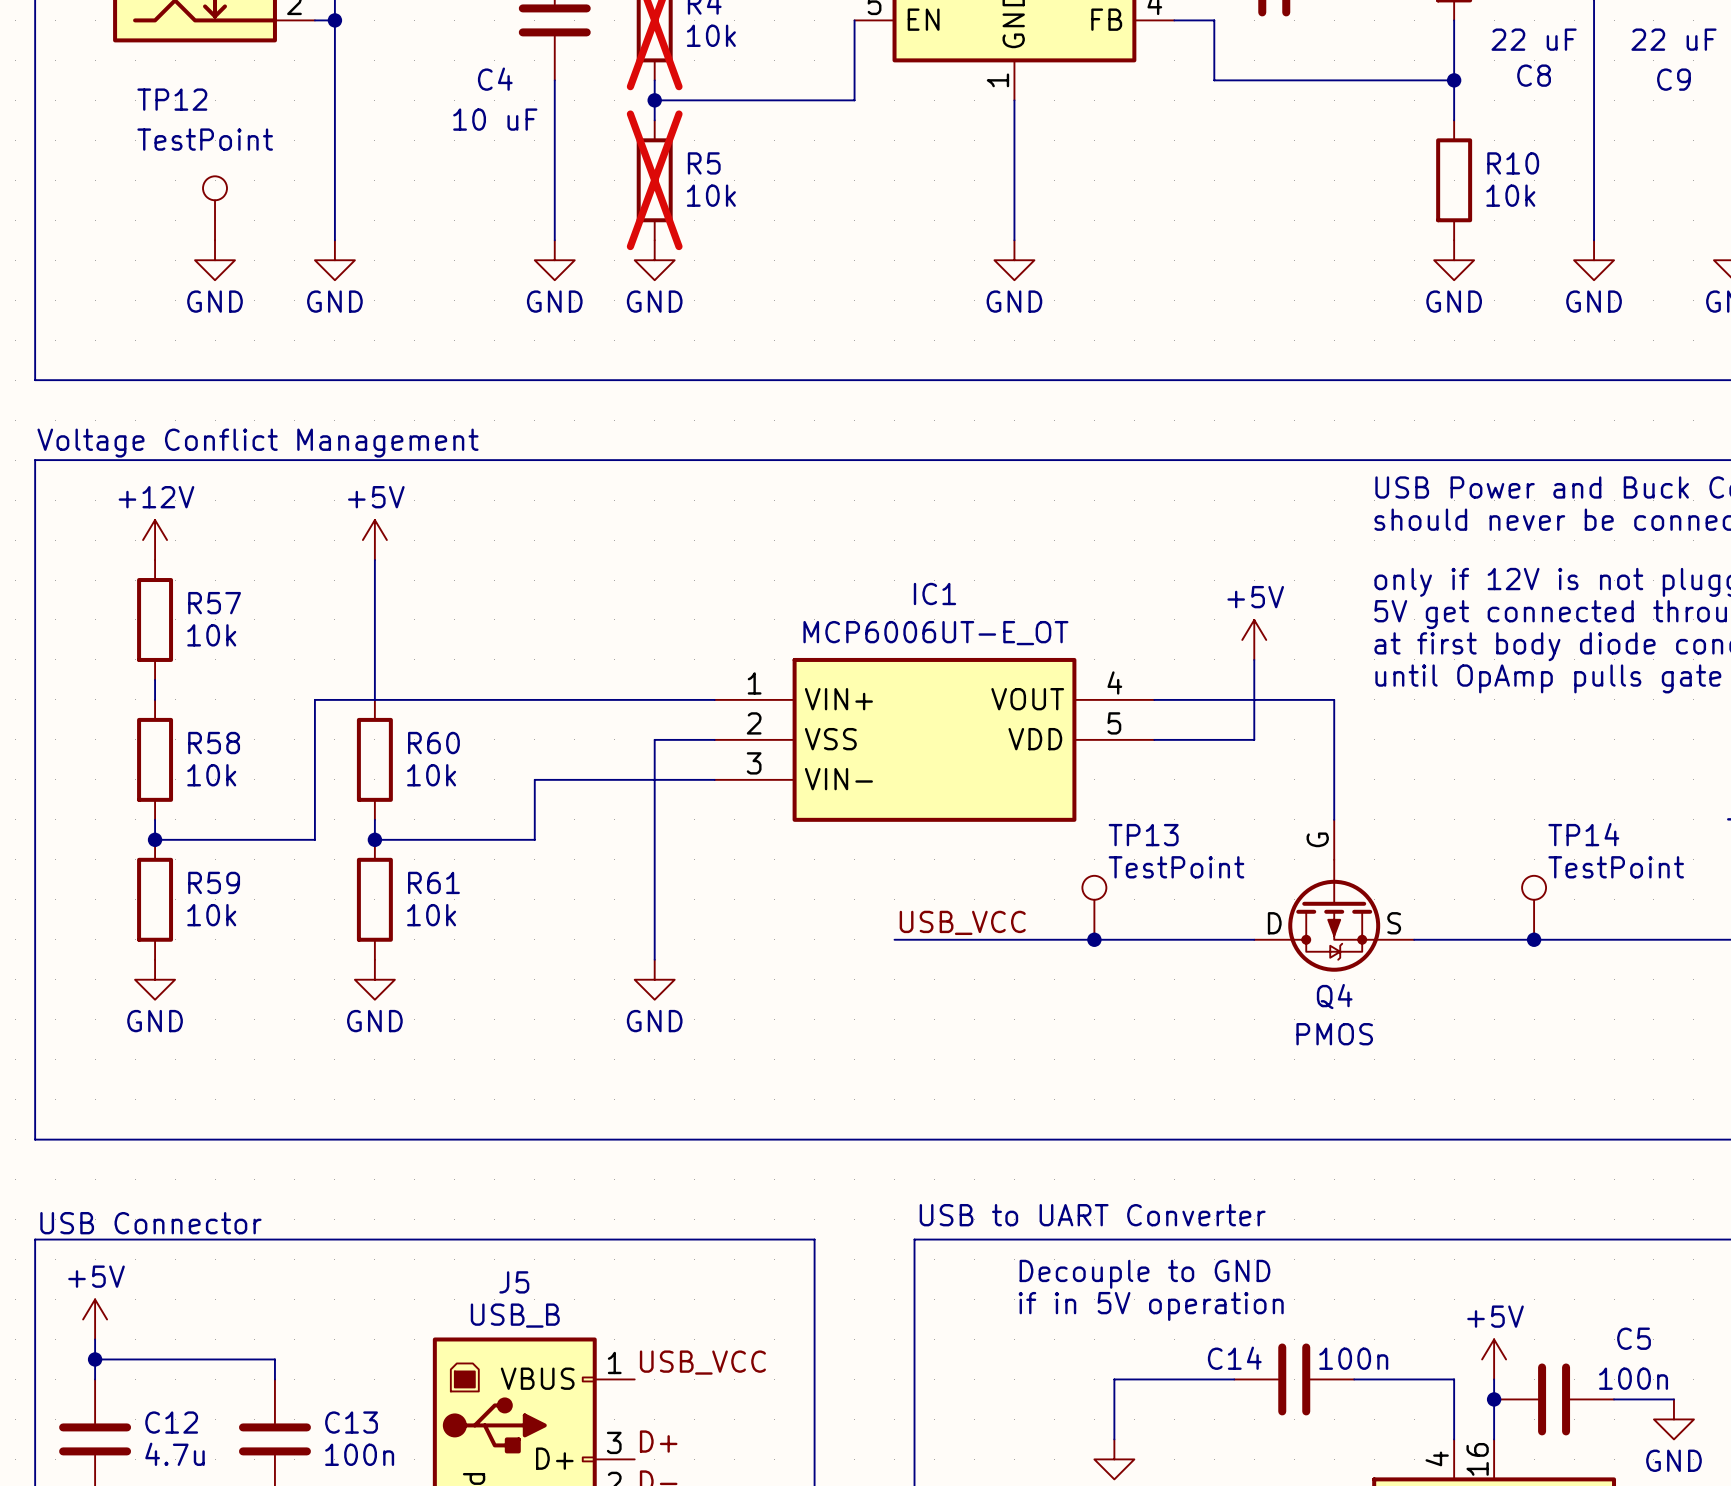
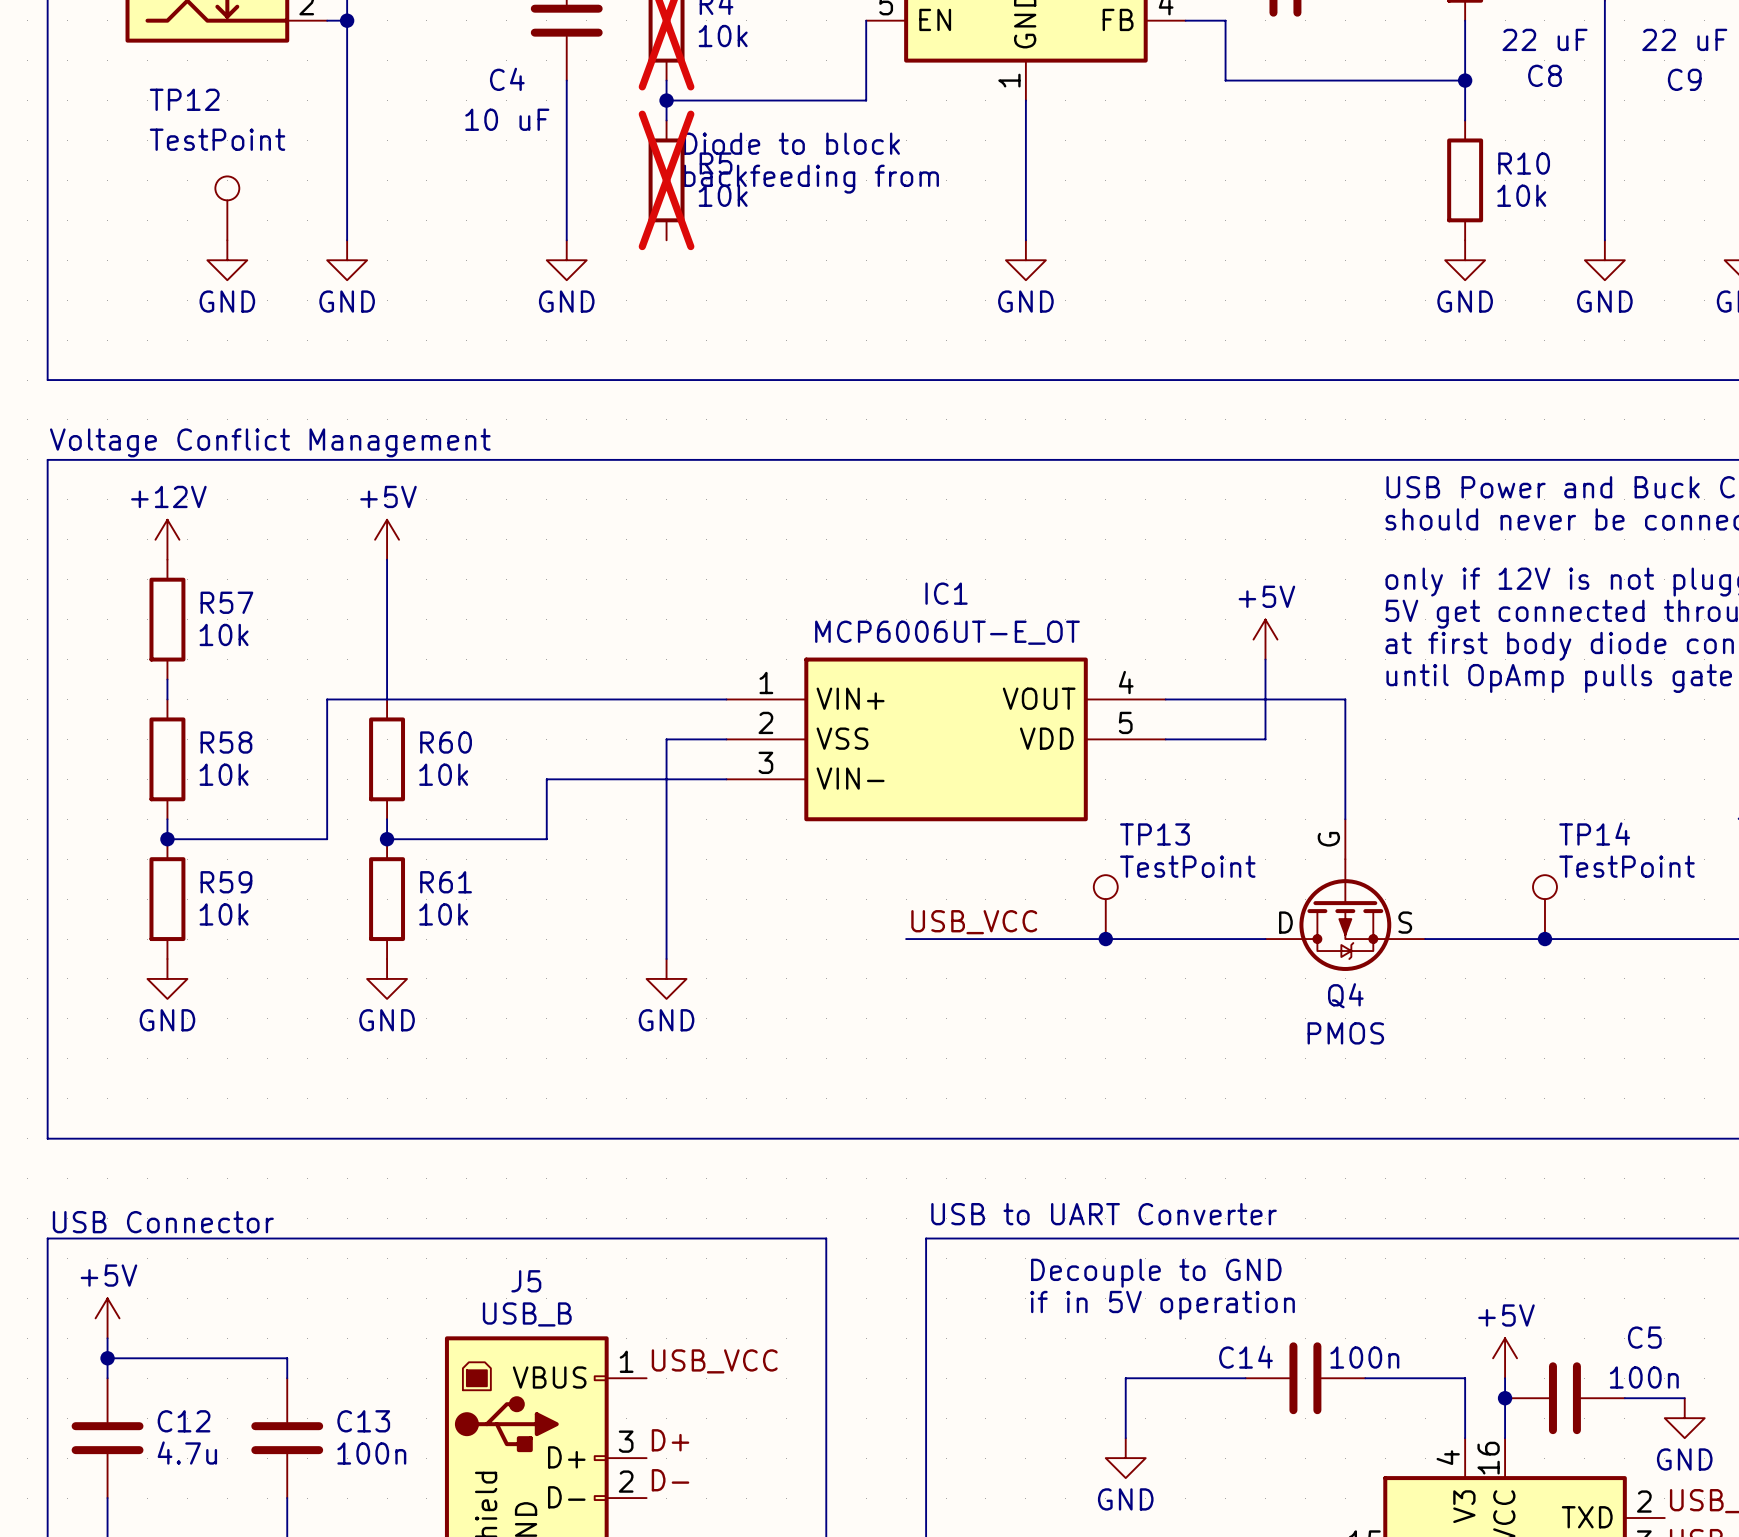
text: none -> Diode to block (791, 143)
text: none -> backfeeding from (811, 179)
power symbol: GND (654, 260) -> none

